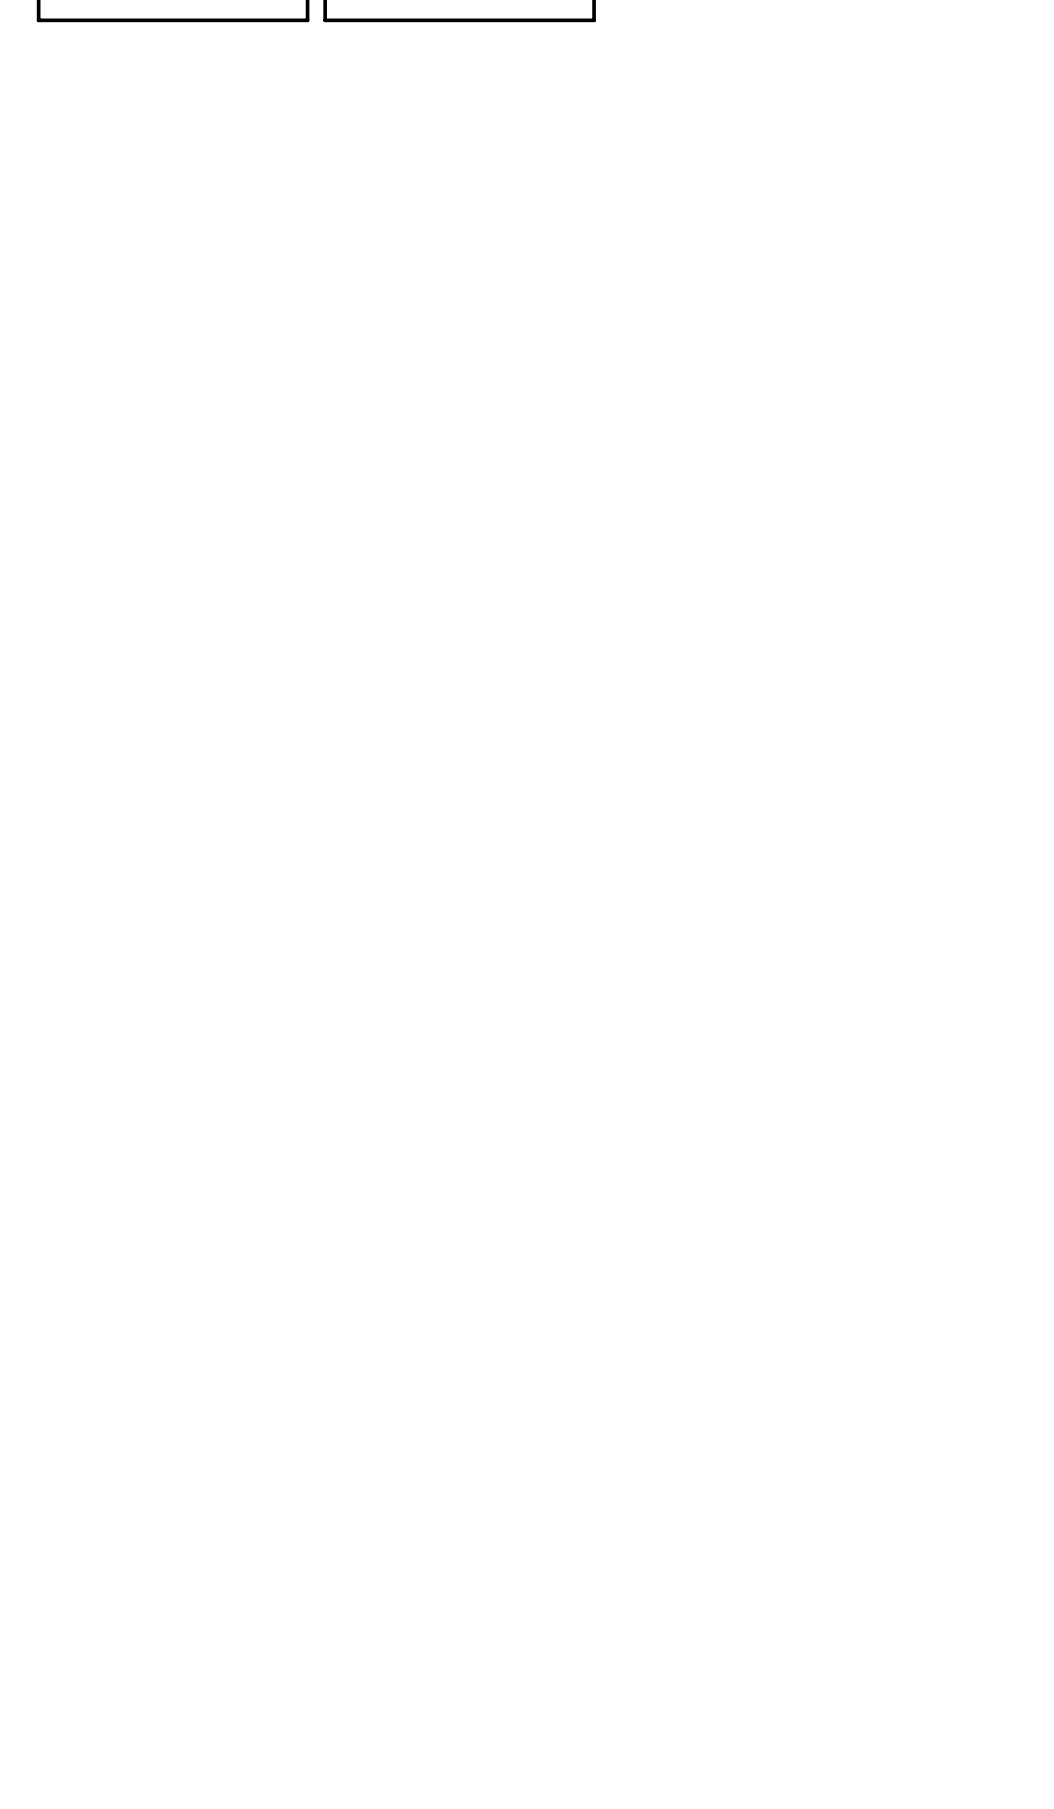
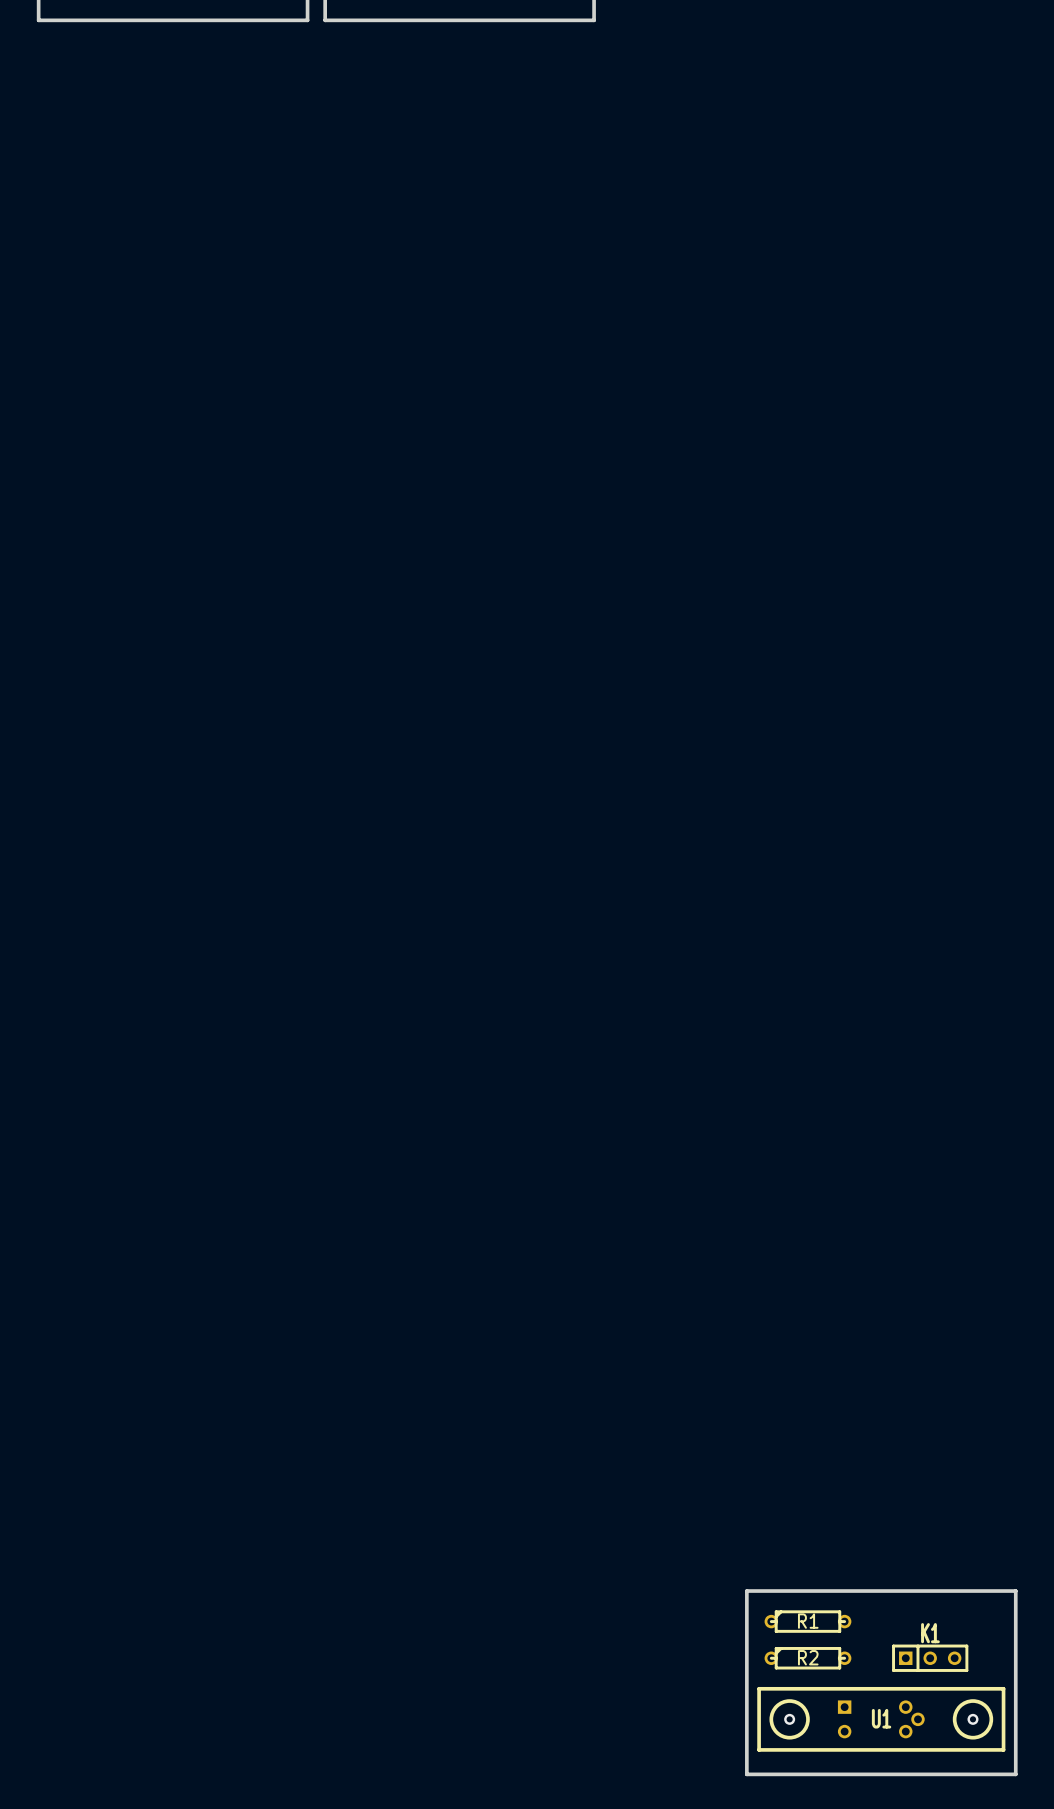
board edge: none -> (746, 1591) (746, 1774) (1015, 1774) (1015, 1591) (746, 1591)
R1: none -> (807, 1621)
R2: none -> (807, 1658)
K1: none -> (930, 1658)
via: none -> (789, 1719)
U1: none -> (881, 1719)
via: none -> (972, 1719)

